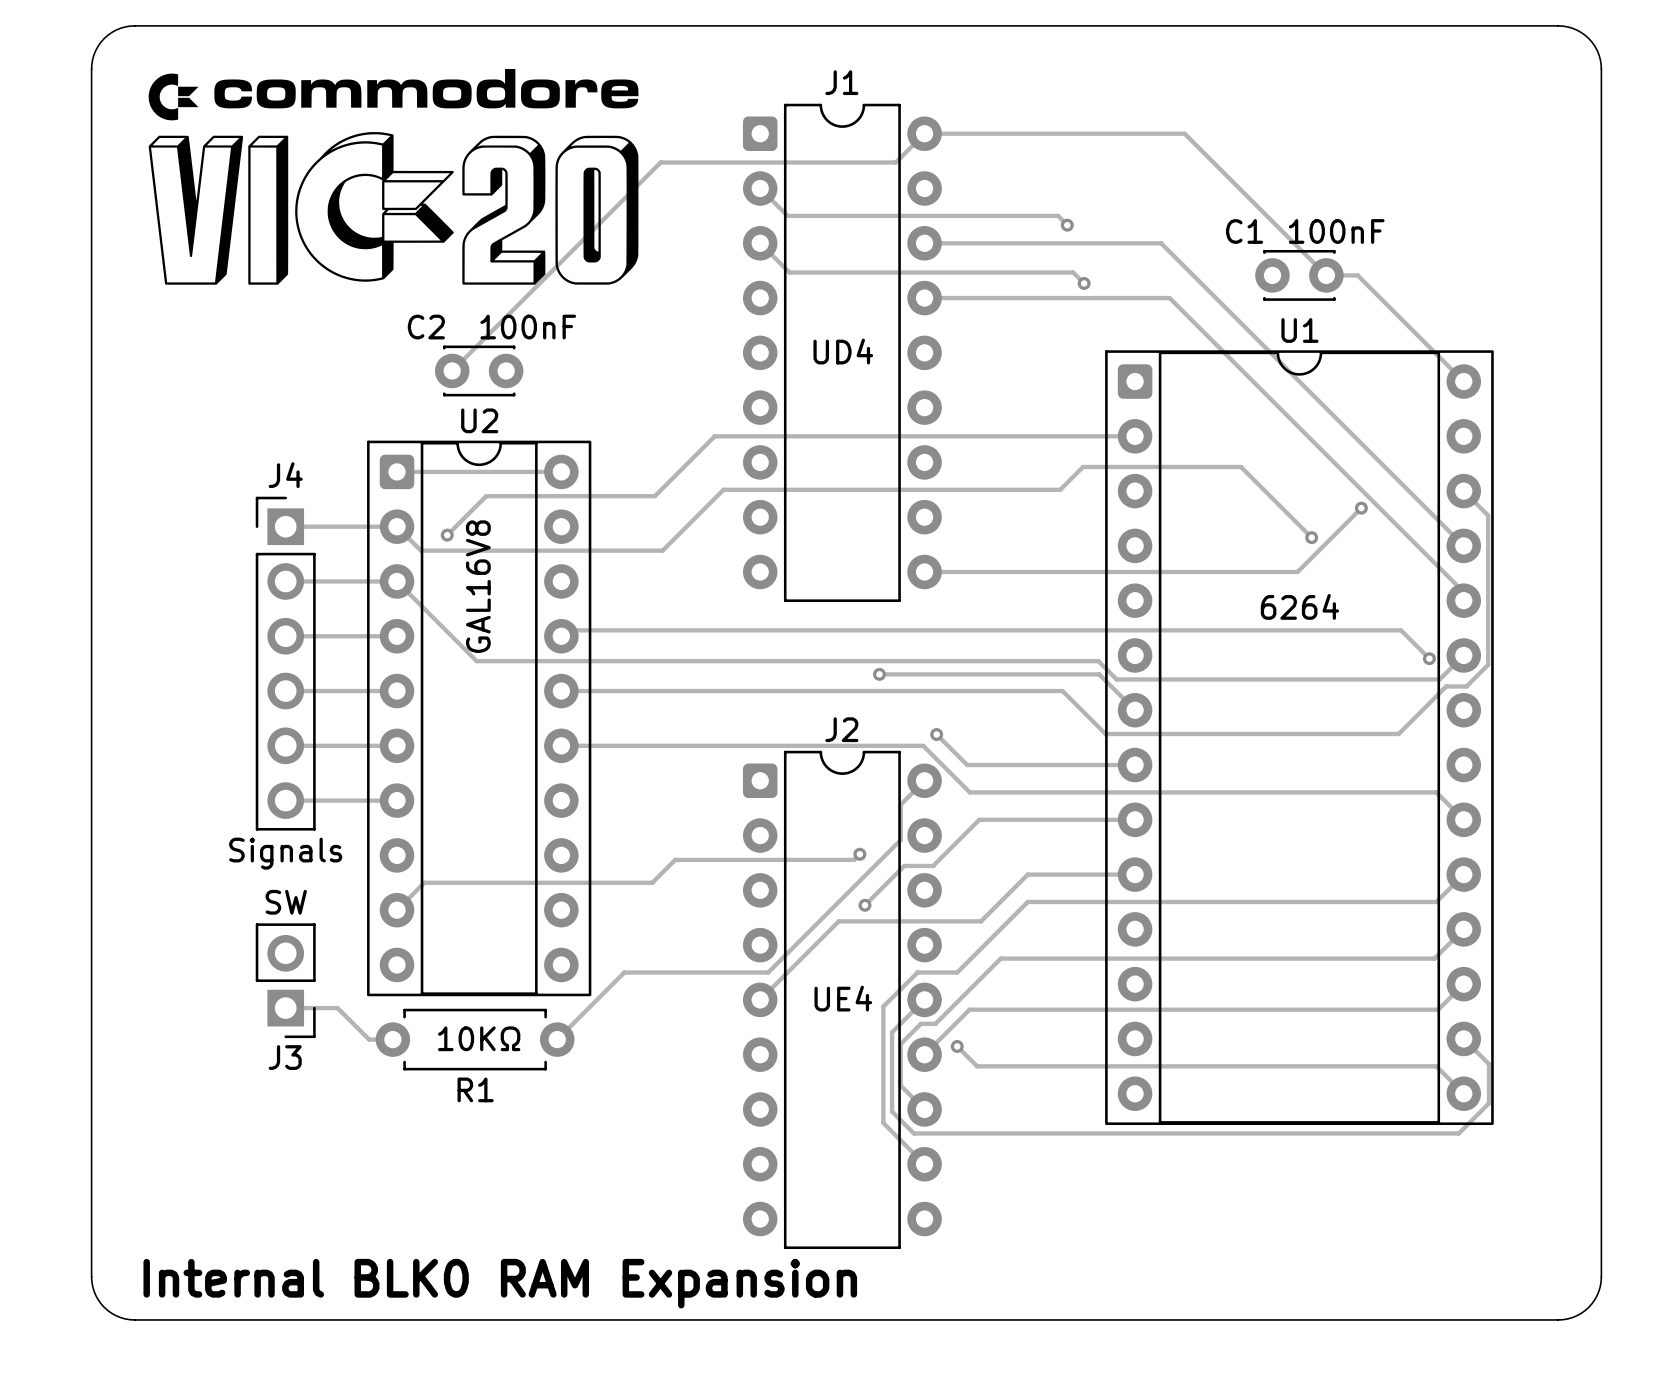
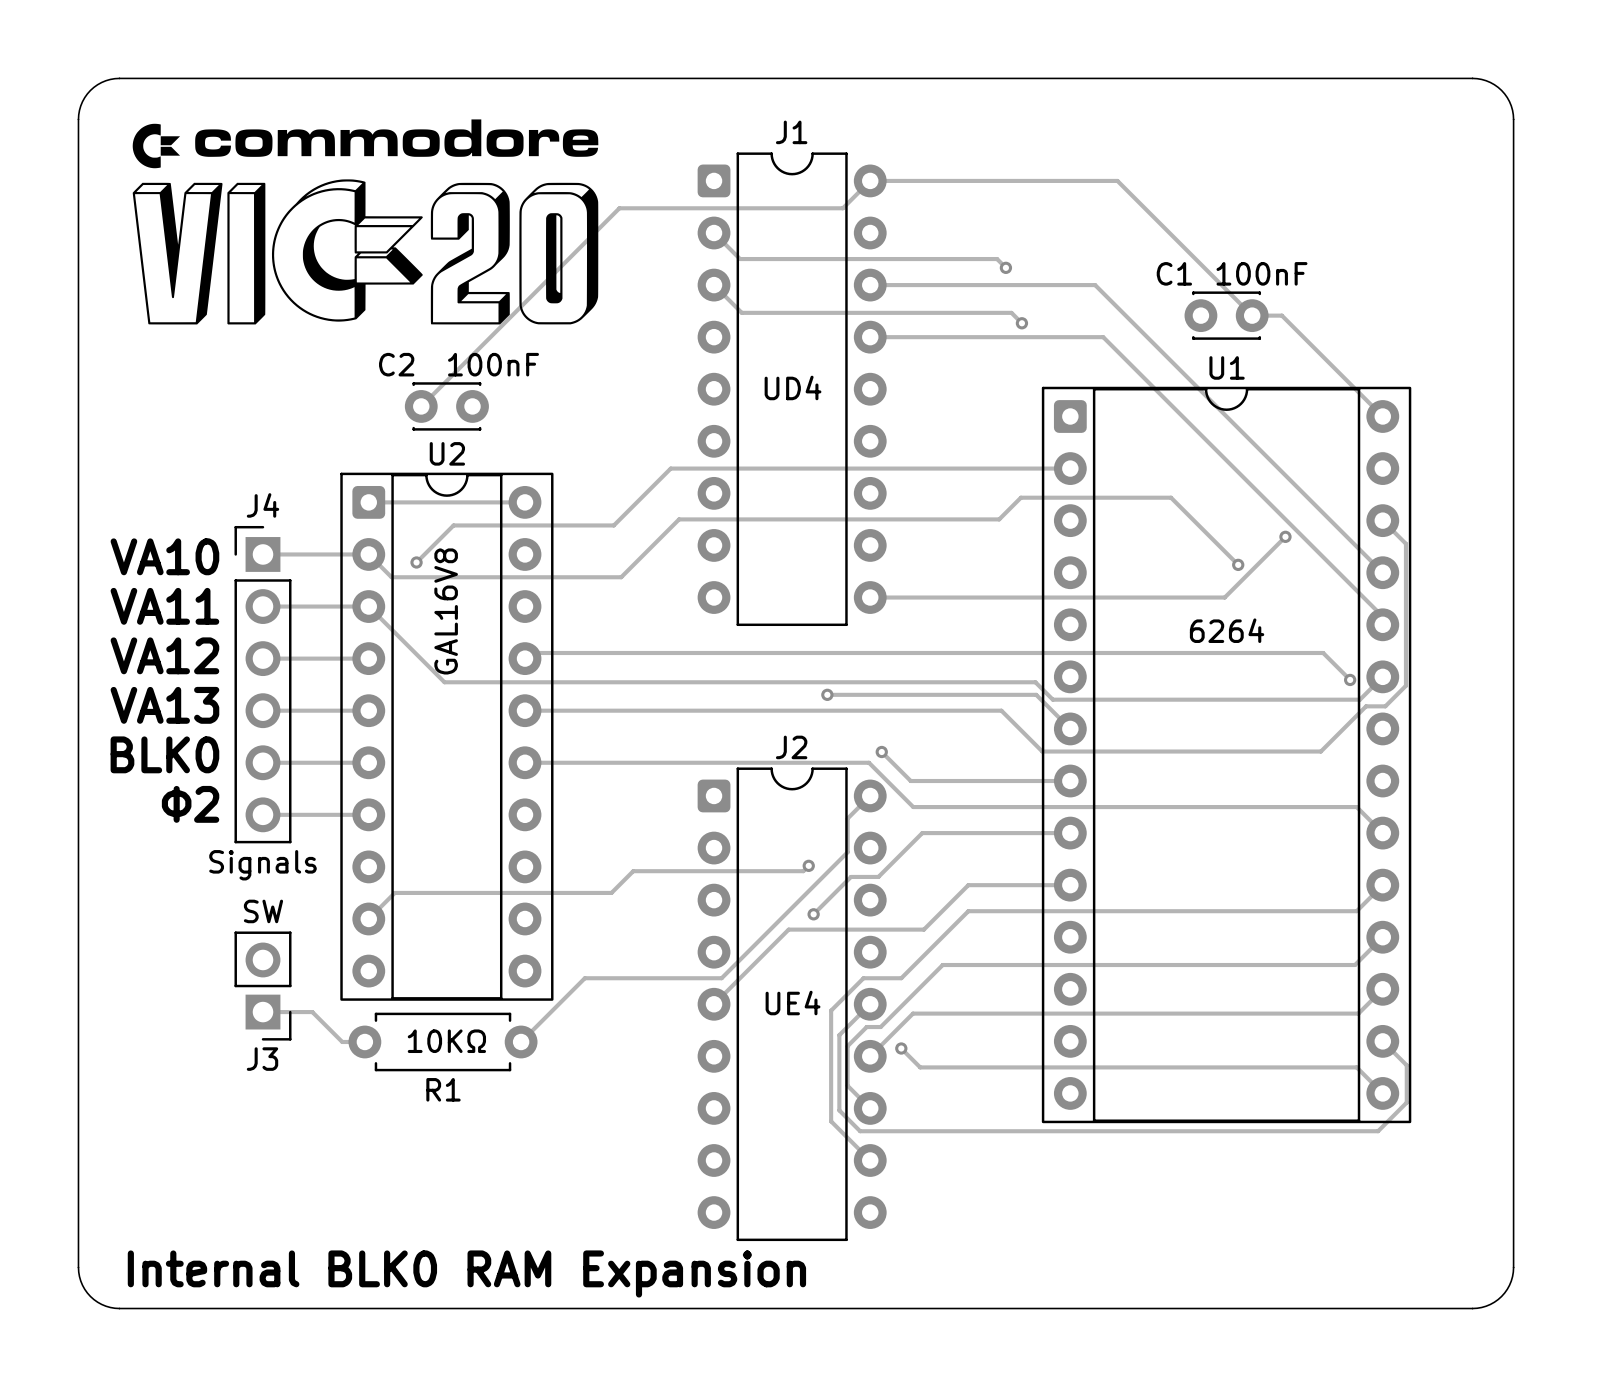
text: none -> VA10 (164, 556)
text: none -> VA11 (164, 606)
text: none -> VA12 (164, 655)
text: none -> VA13 (164, 705)
text: none -> BLK0 (164, 754)
text: none -> Φ2 (190, 804)

